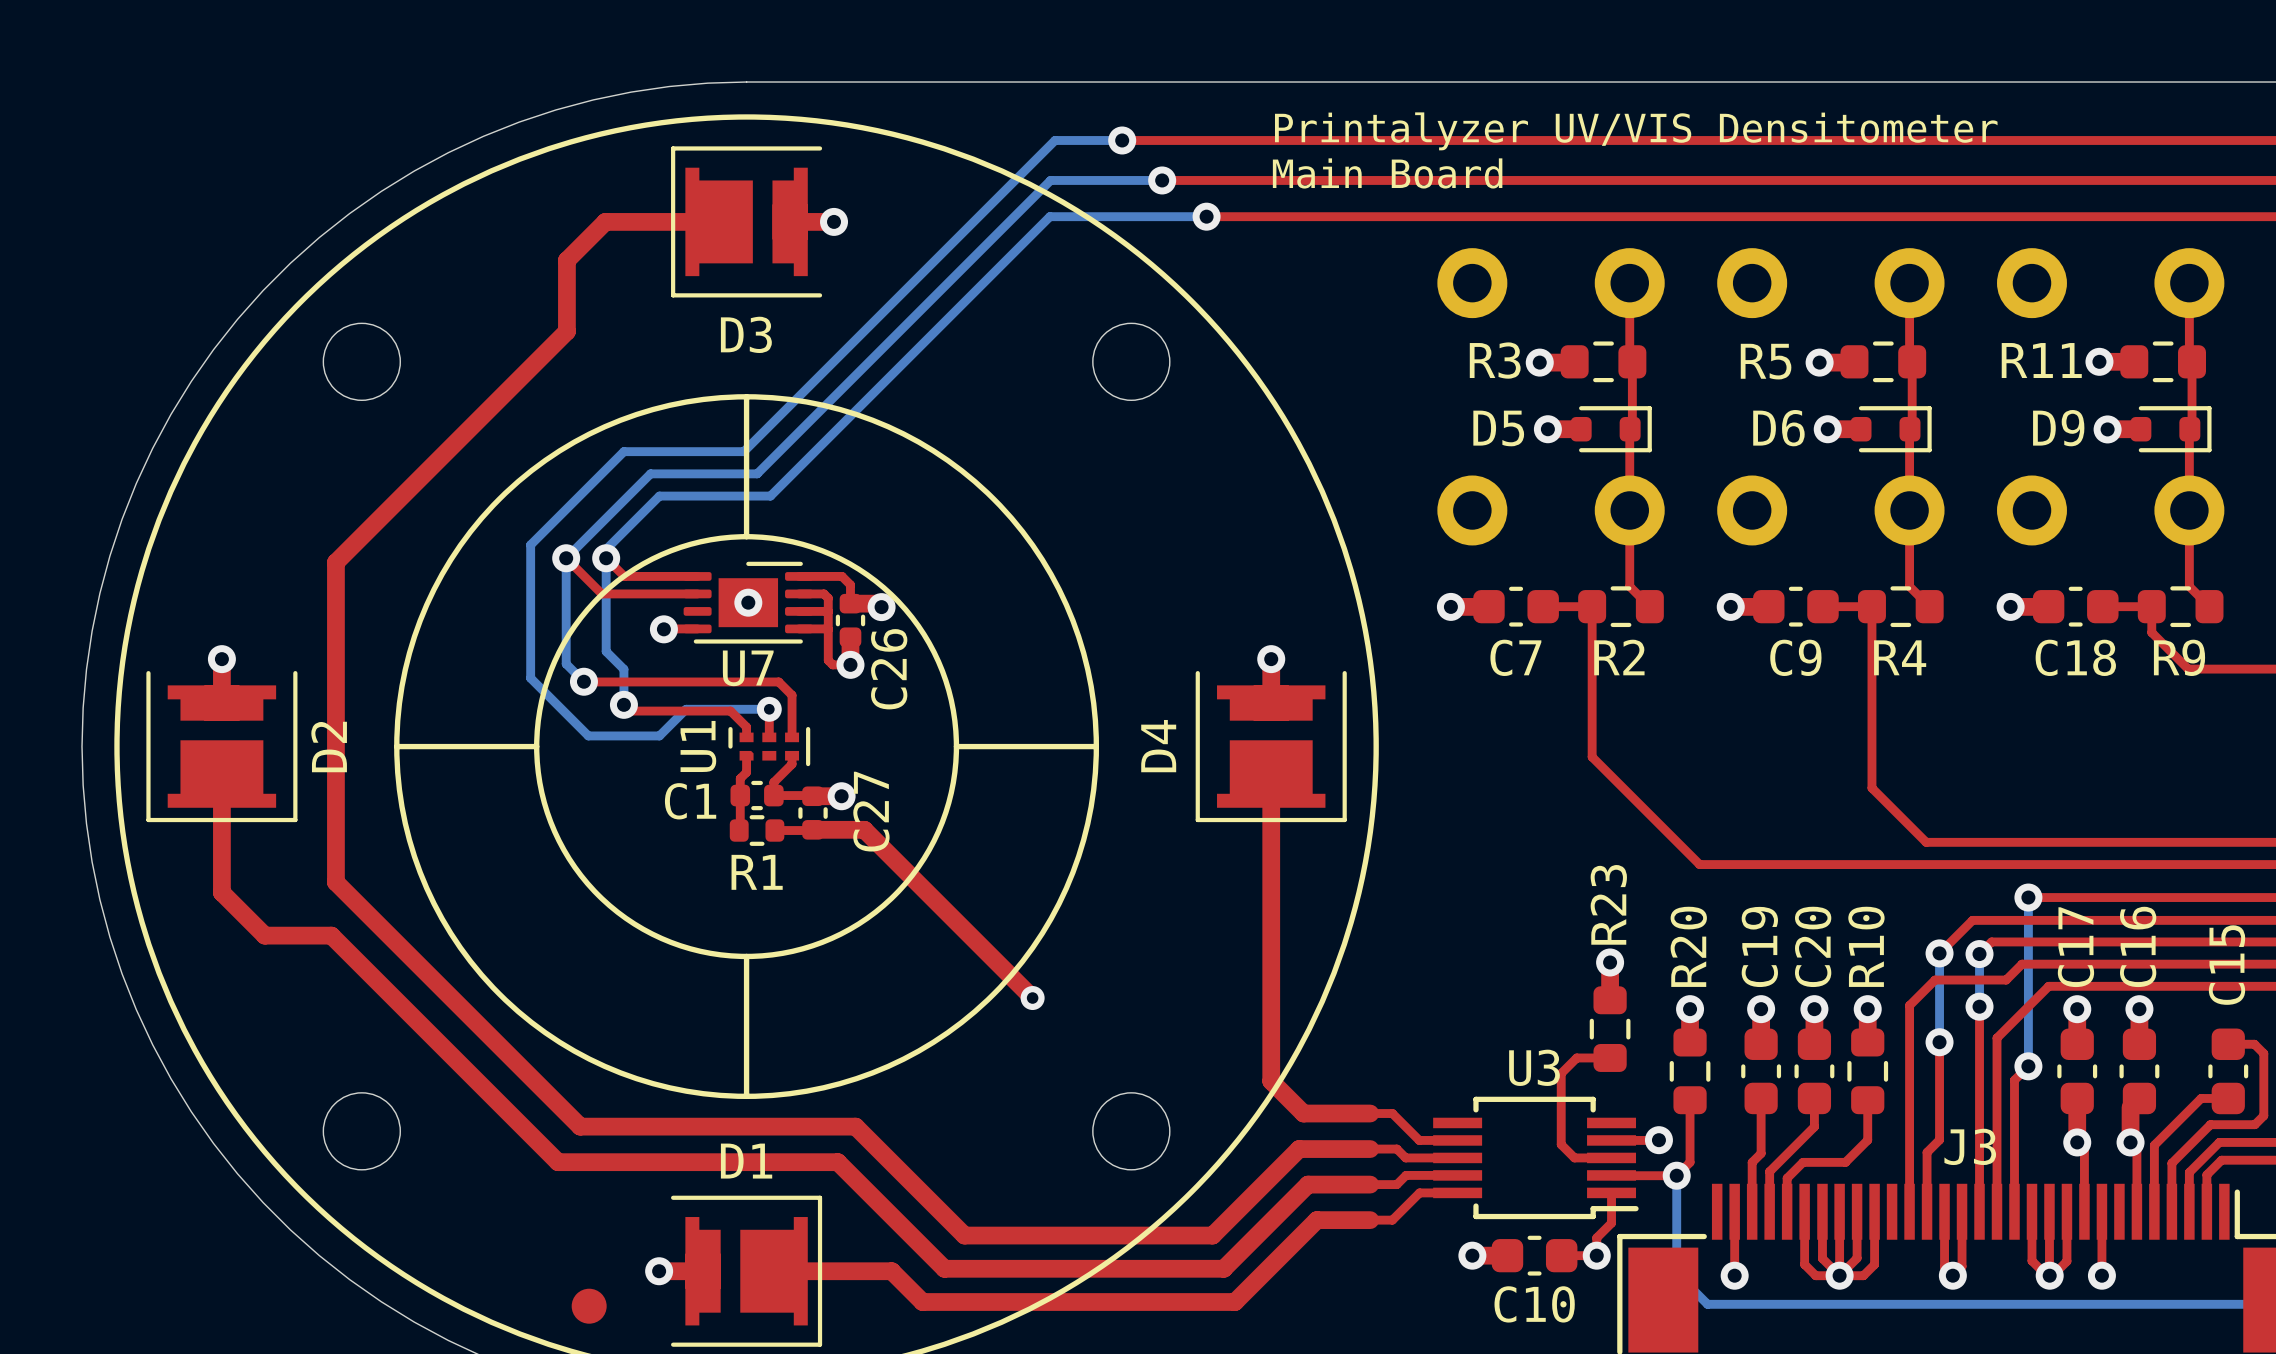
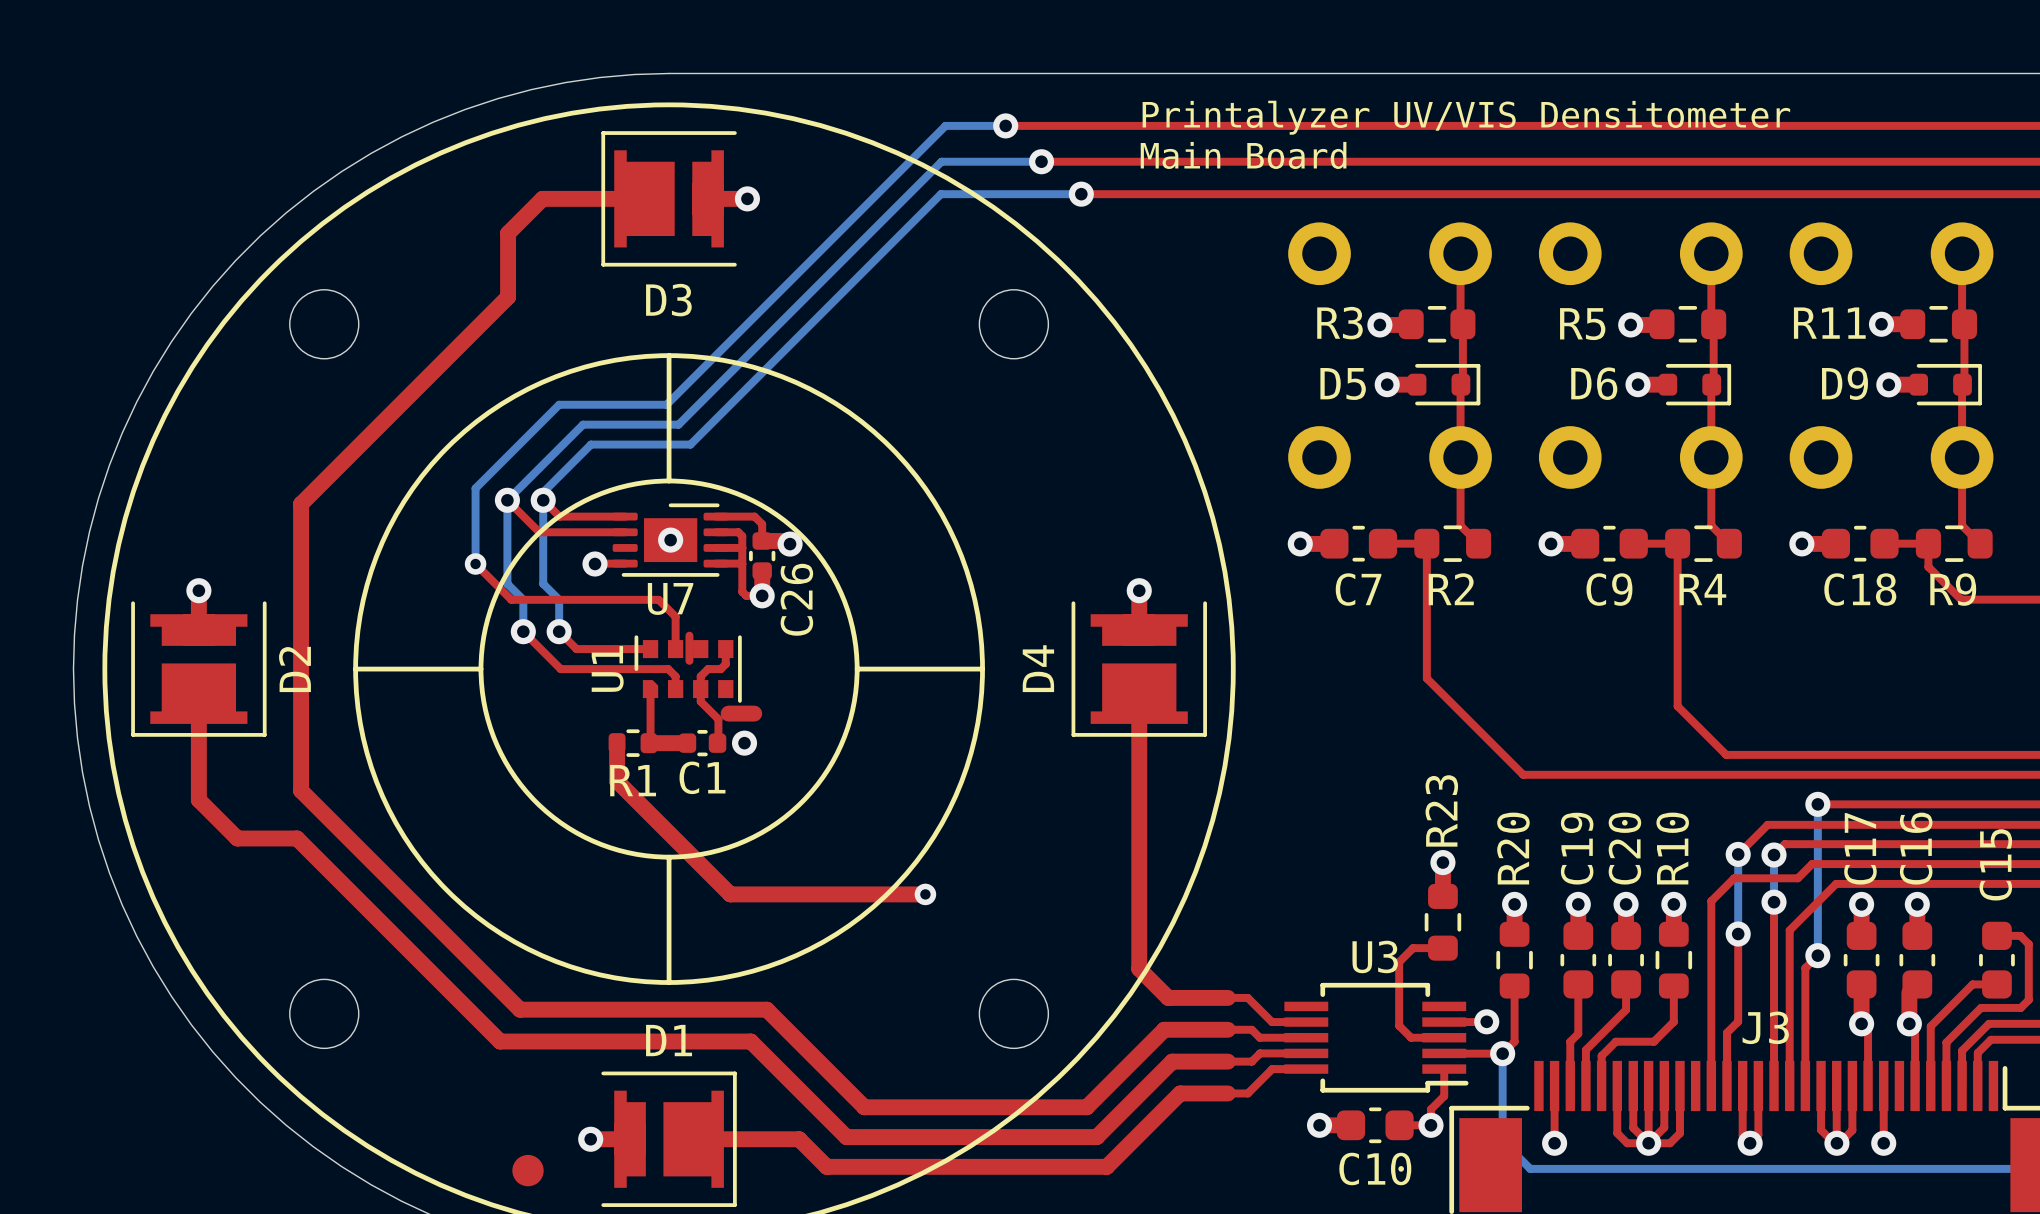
top track: none -> (475, 564) (511, 599) (658, 599) (675, 616) (675, 649)
bottom track: (530, 629) (530, 678) (588, 735) (659, 735) (686, 709) (769, 709) -> none
via: none -> (475, 564)
bottom track: (566, 651) (566, 663) (583, 681) -> (507, 583) (523, 599) (523, 631)
via position: (583, 681) -> (523, 631)
top track: (584, 681) (778, 681) (792, 695) (792, 737) -> none
top track: none -> (523, 631) (560, 669) (668, 669) (675, 676) (675, 689)
via: (769, 709) -> none
top track: (630, 711) (730, 711) (746, 727) (746, 737) -> (564, 637) (576, 649) (650, 649)
top track: none -> (725, 649) (725, 664) (720, 669) (708, 669) (700, 676) (700, 701) (718, 719) (717, 743)
U1 footprint: [728, 726, 811, 767] -> [634, 635, 742, 703]
U1 name position: U1 (698, 746) -> U1 (607, 668)
top track: (746, 755) (746, 772) (740, 778) (739, 830) -> none
top track: (792, 755) (792, 764) (773, 782) (773, 795) (812, 795) -> none
top track: none -> (650, 689) (649, 743) (686, 743)
C1 position: (757, 795) -> (702, 743)
via position: (841, 796) -> (744, 743)
C1 name position: C1 (690, 801) -> C1 (702, 777)
C27: (813, 813) -> none
top track: (813, 829) (864, 829) (1032, 998) -> (617, 743) (617, 781) (730, 894) (925, 894)
R1 position: (757, 830) -> (633, 743)
top track: (774, 830) (812, 830) -> none

